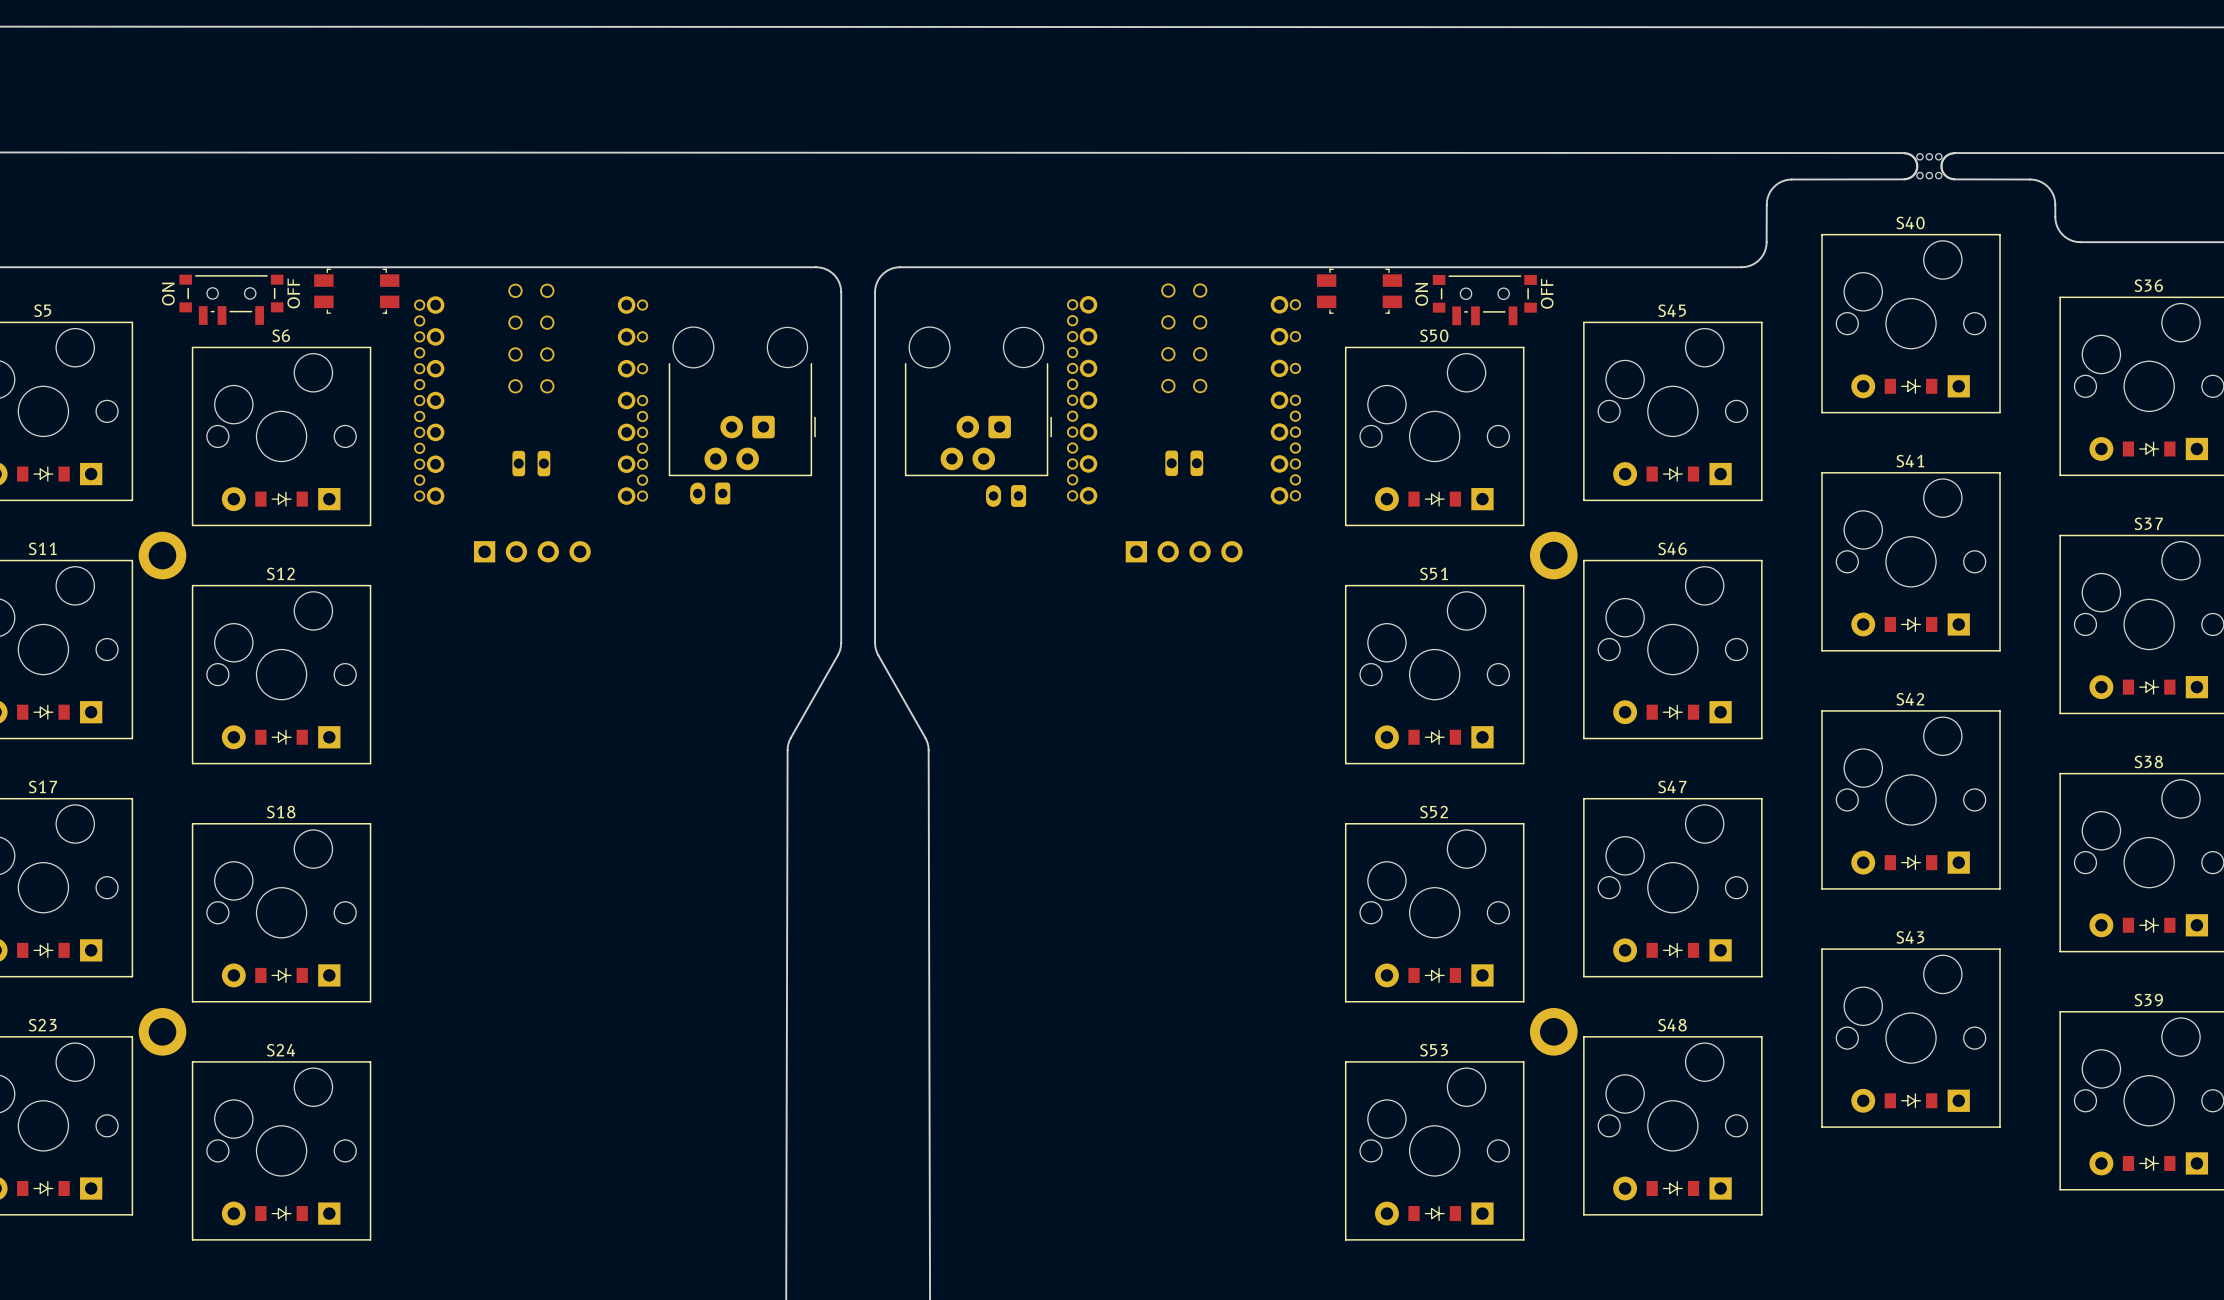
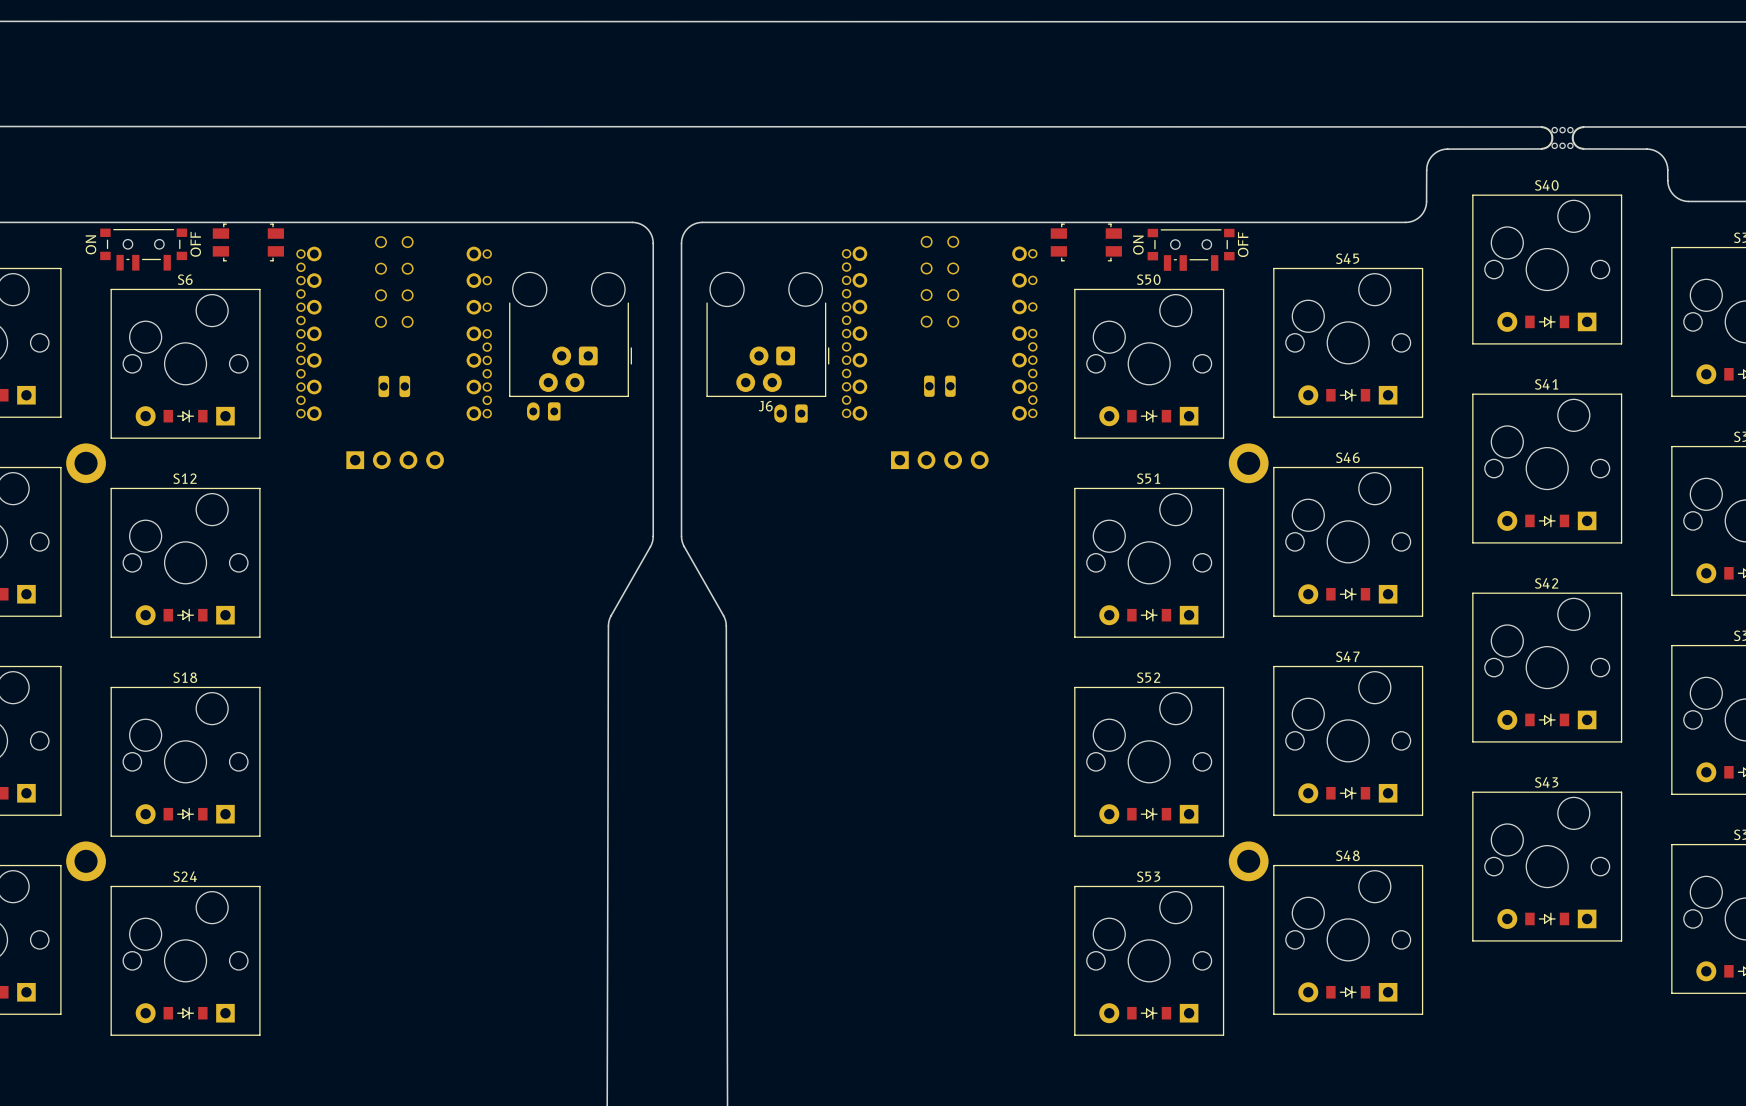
J6 name: none -> J6 (765, 406)

